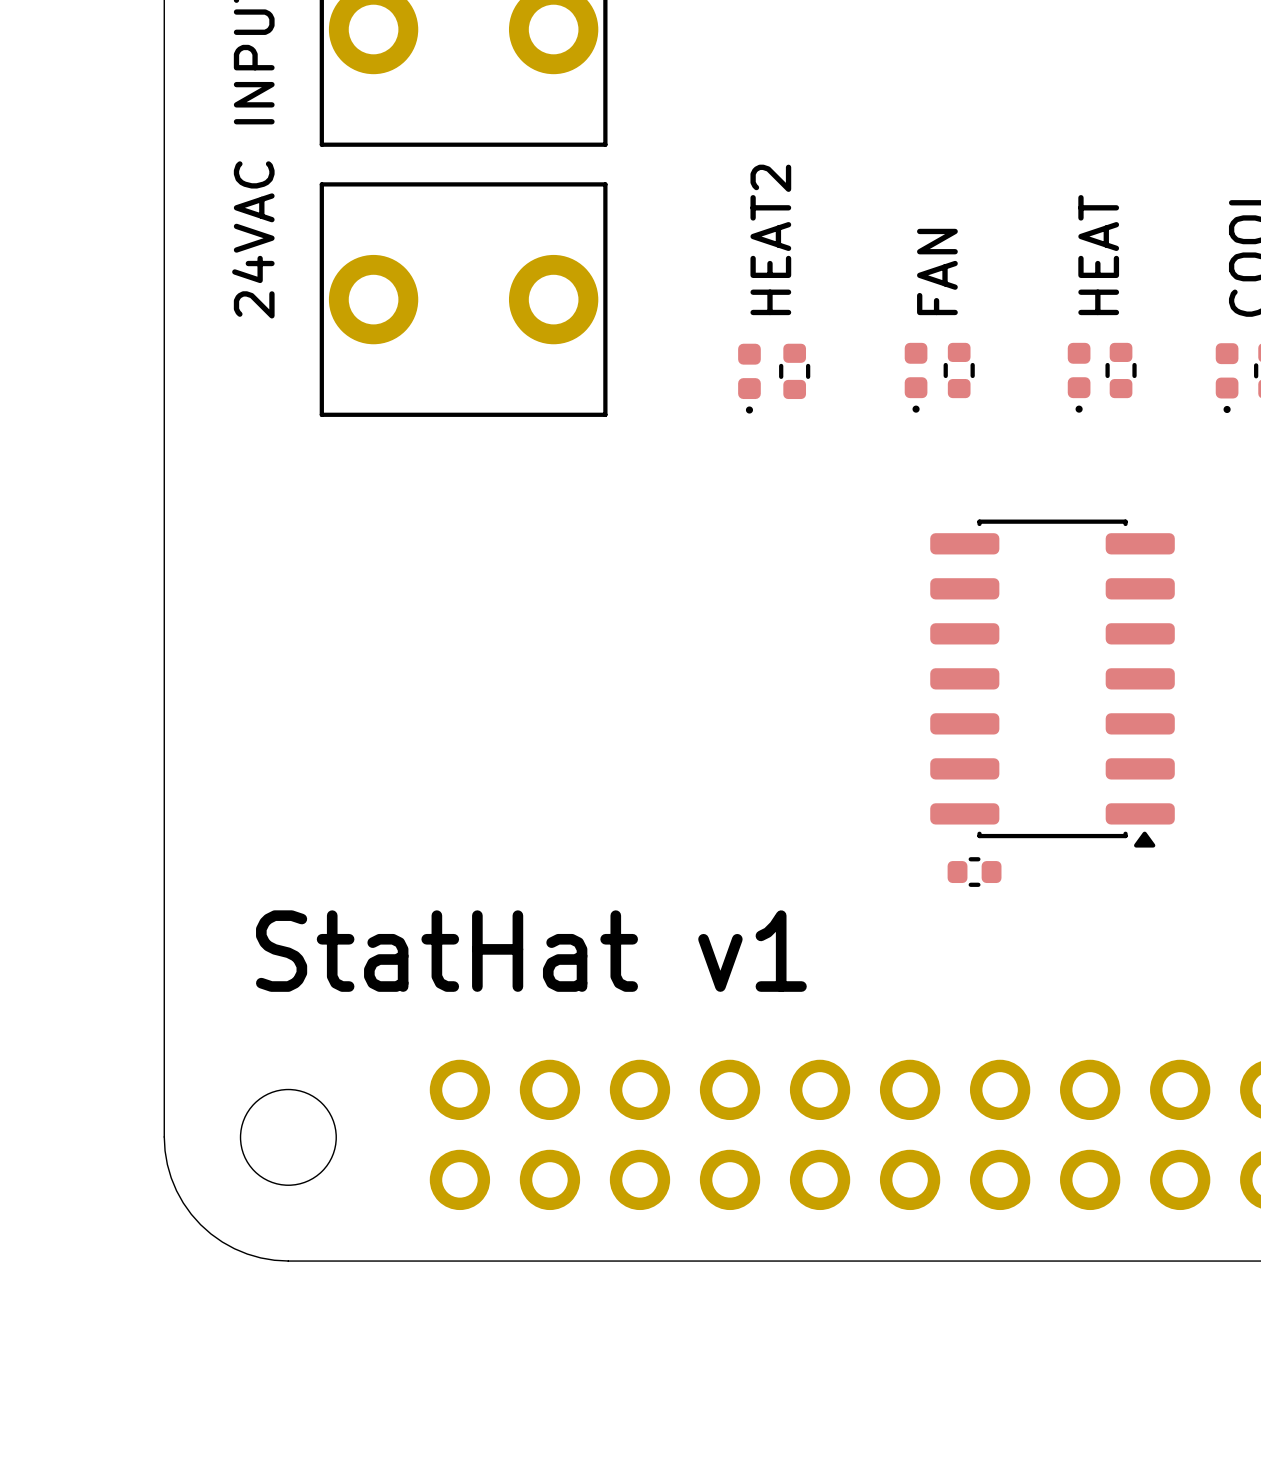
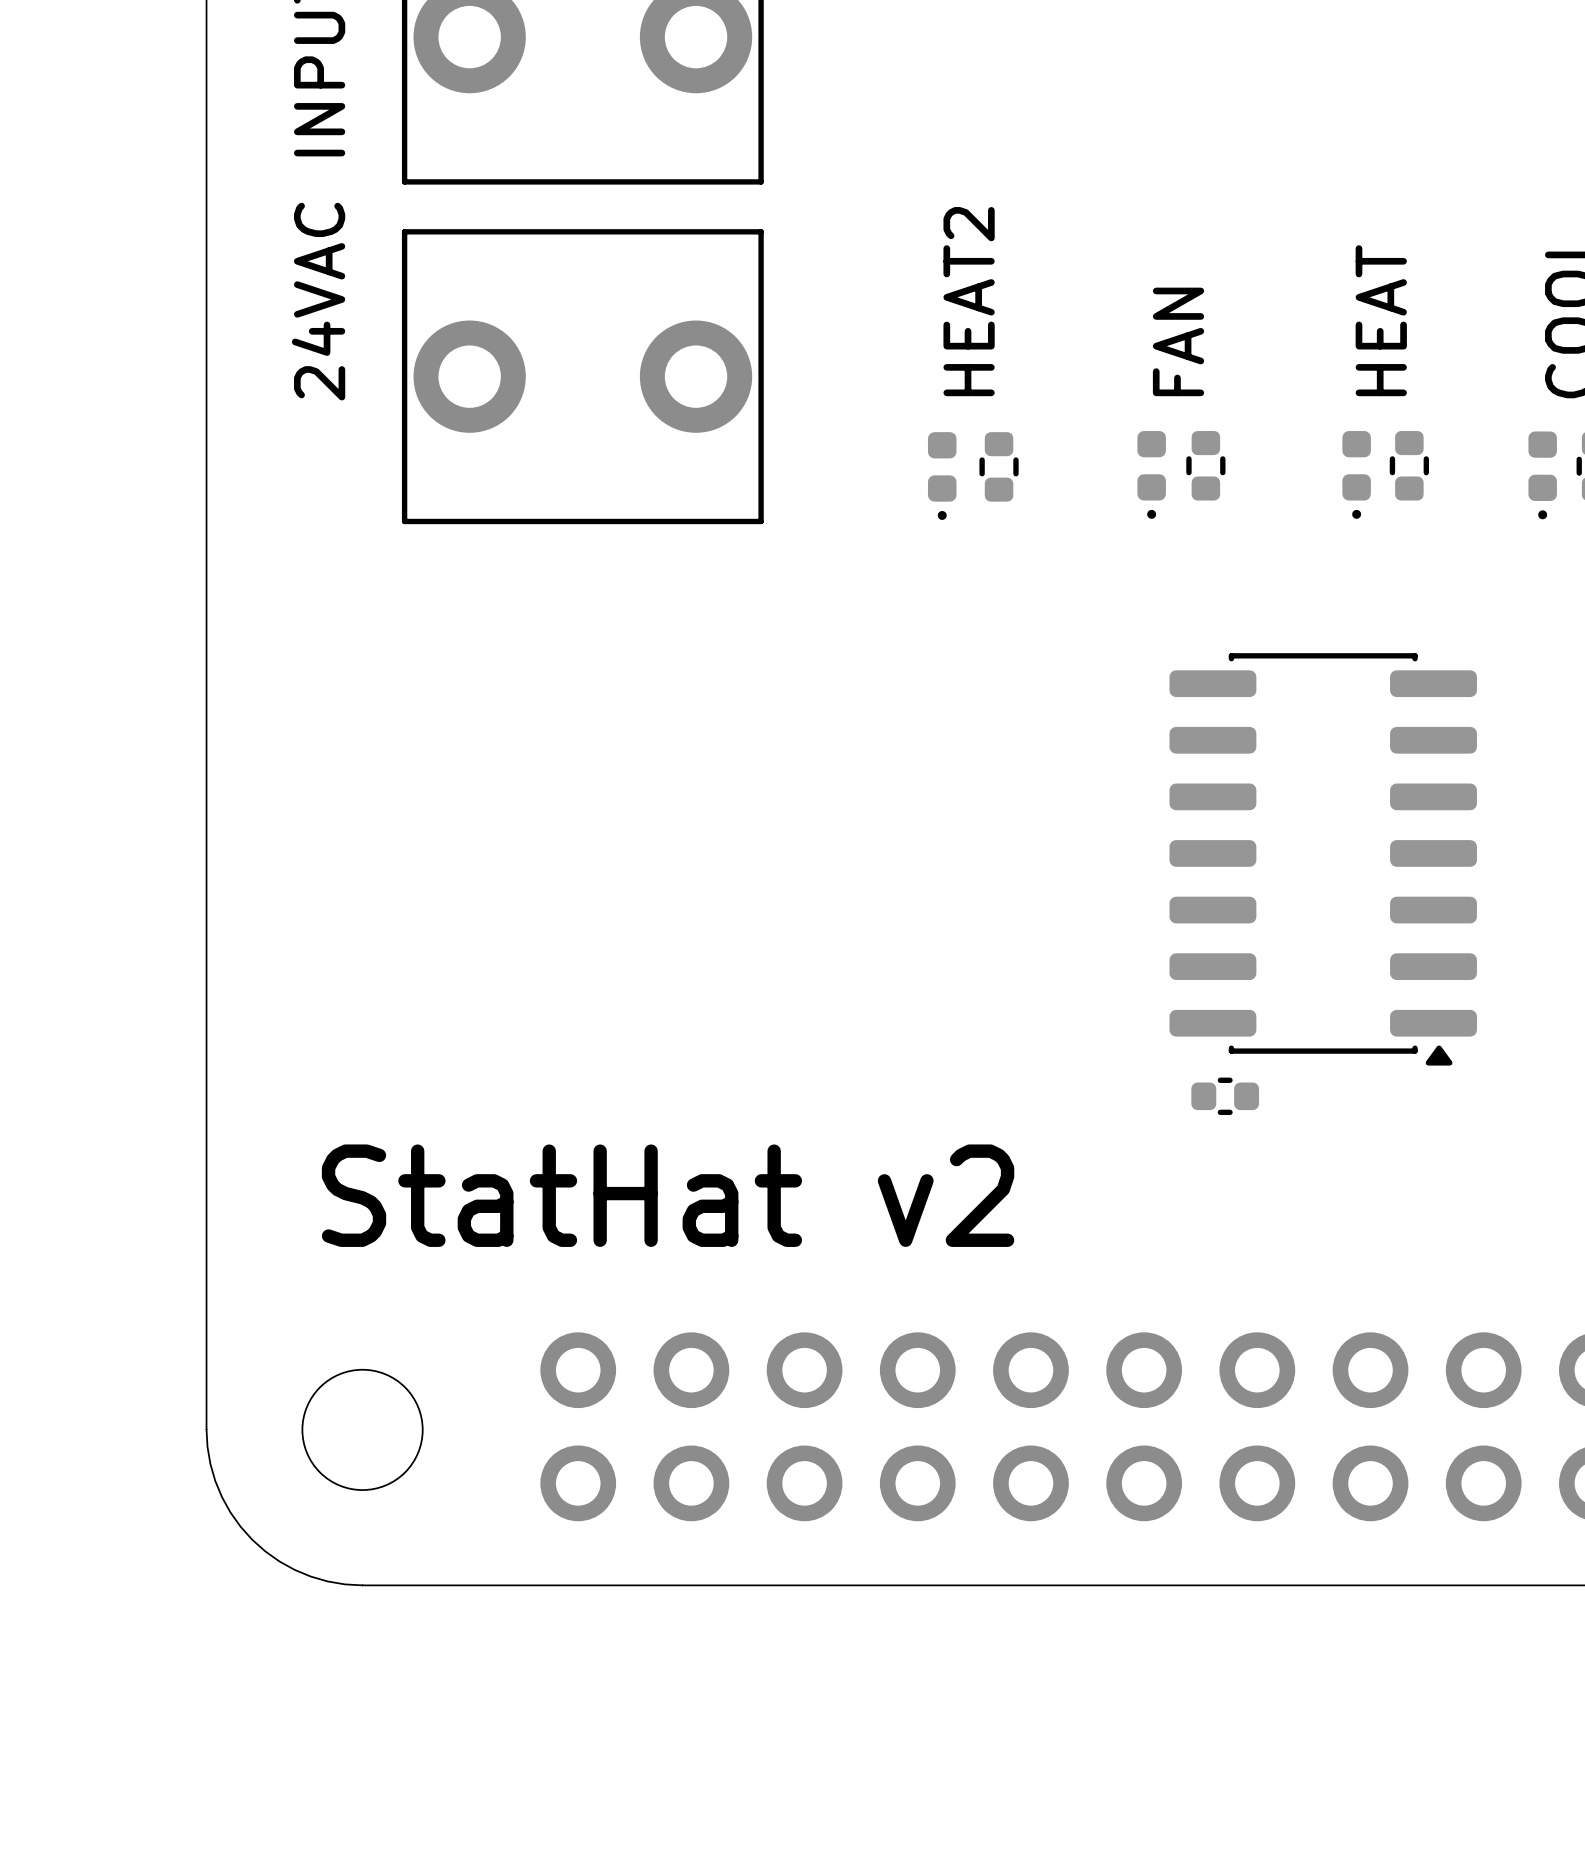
text: StatHat v1 (531, 951) -> StatHat v2 (668, 1195)

